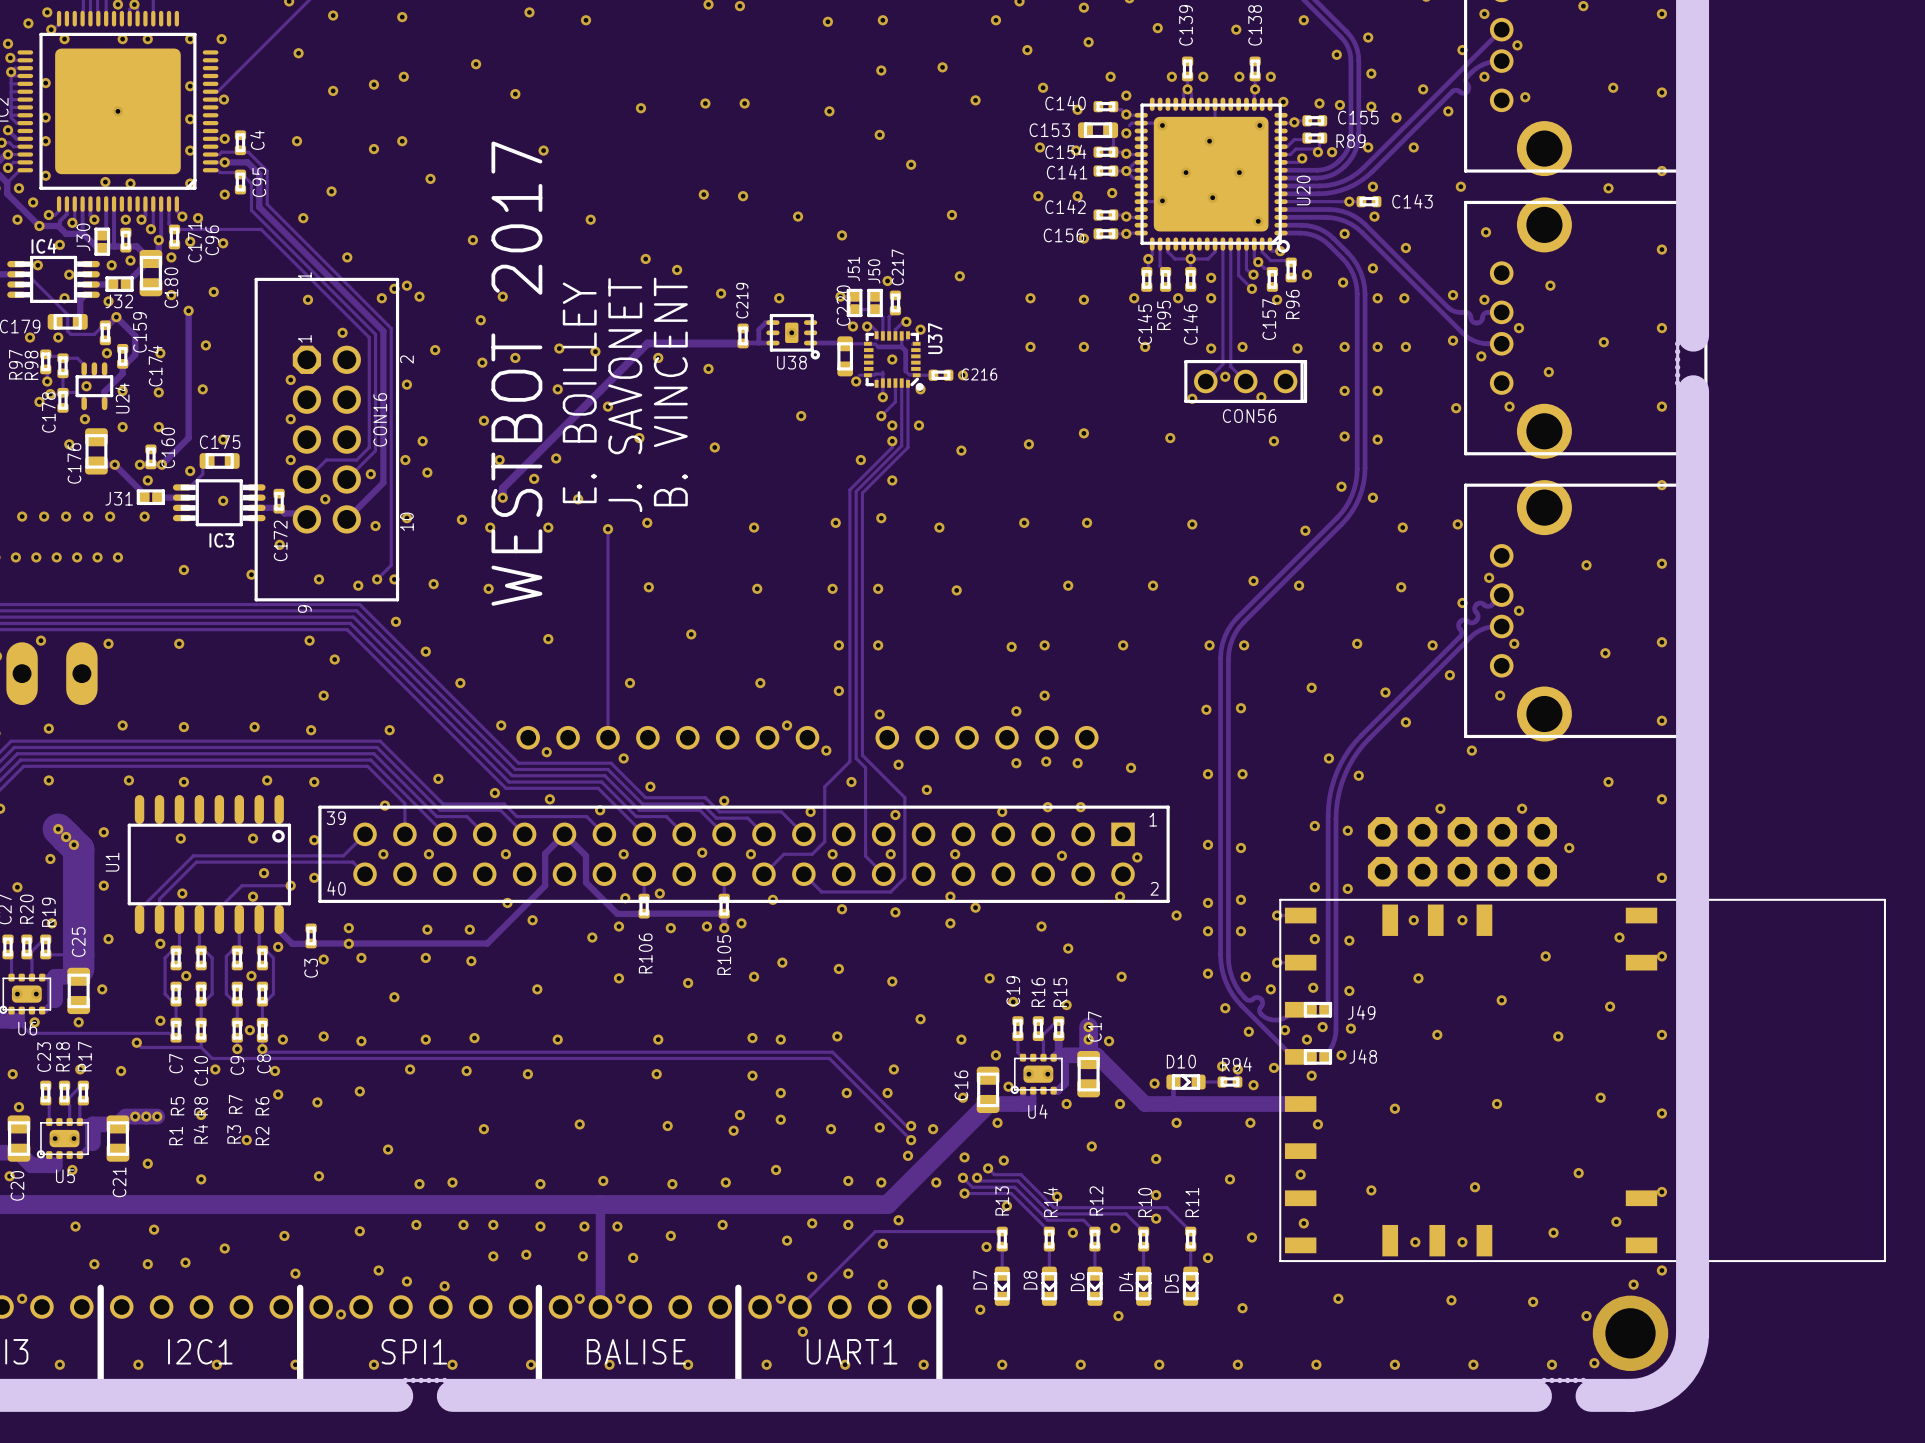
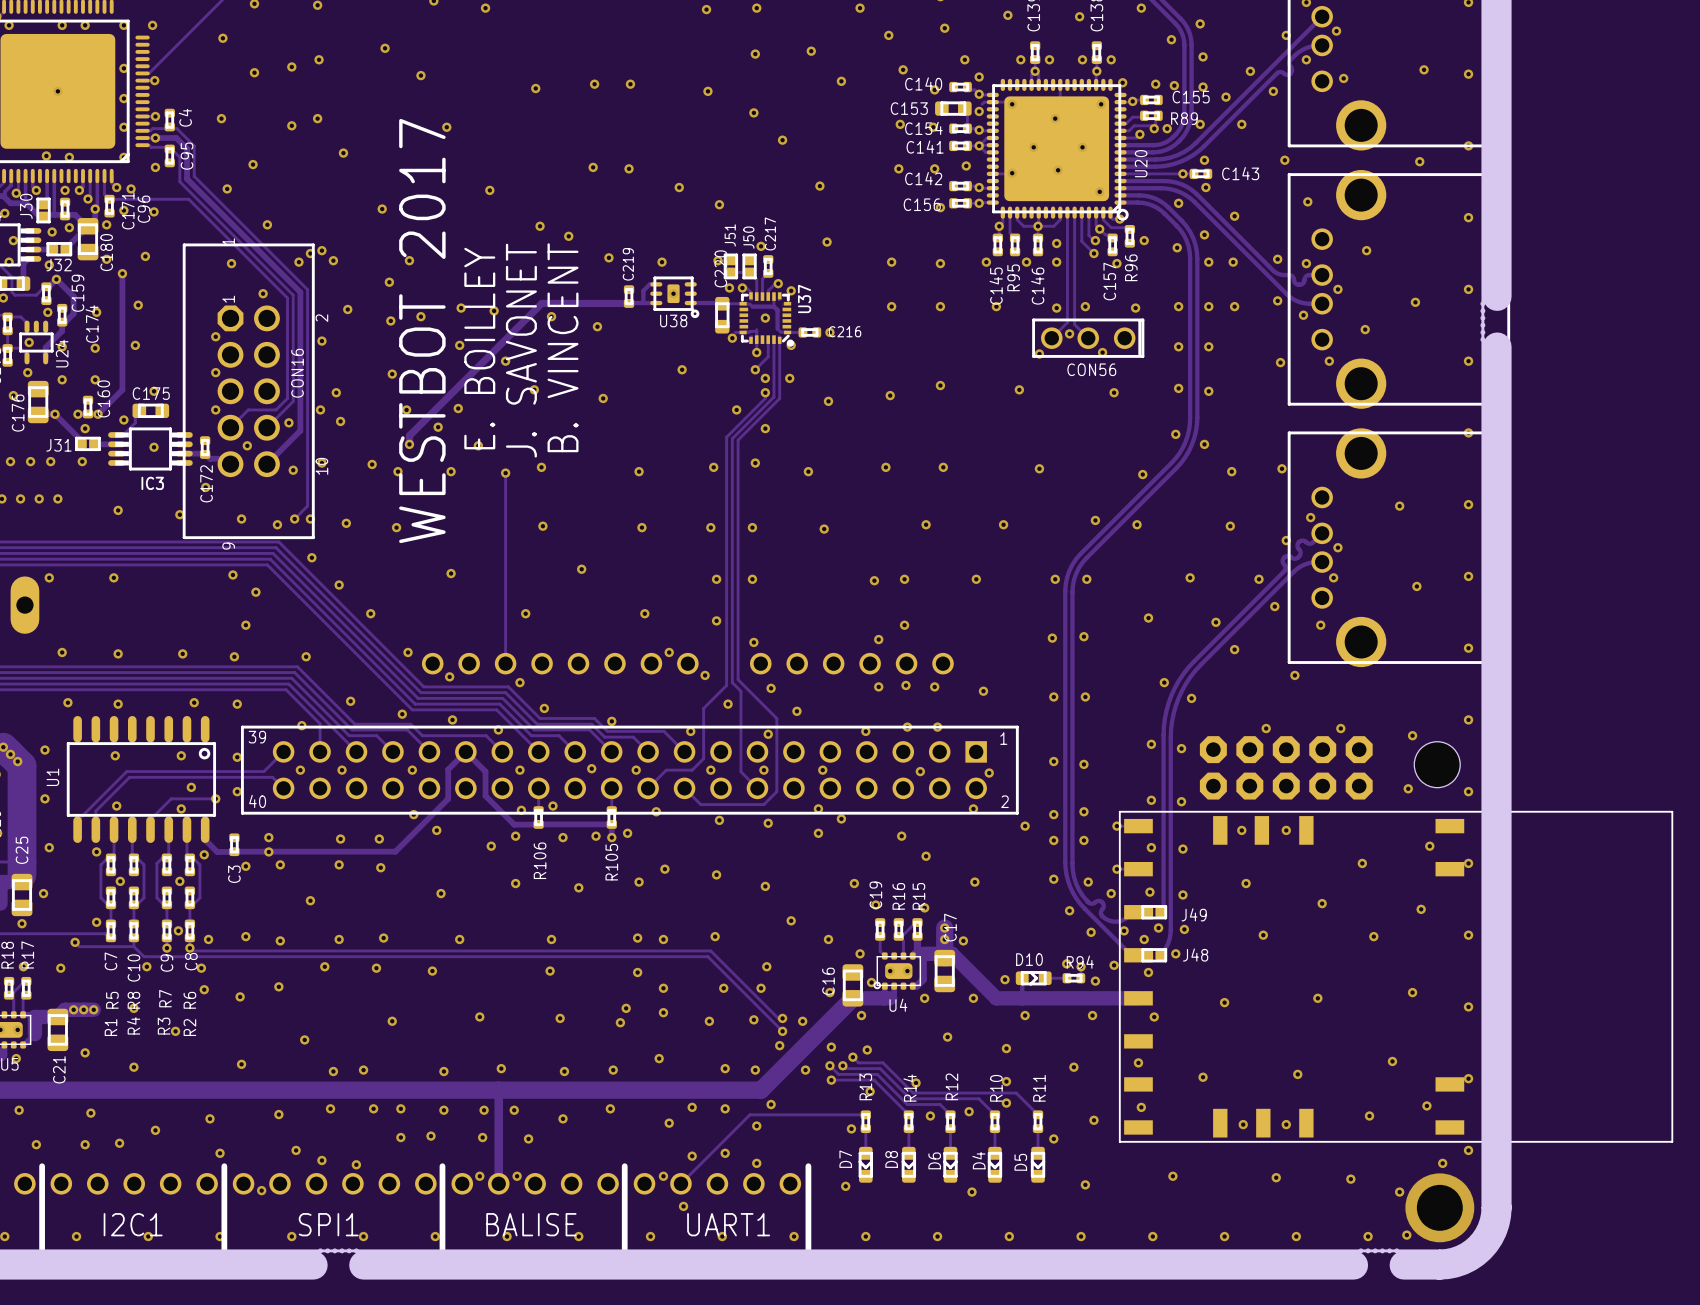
via: (1608, 782) -> none
via: none -> (1412, 735)
via: (1569, 847) -> none
hole: none -> (1437, 764)
via: none -> (1408, 788)

